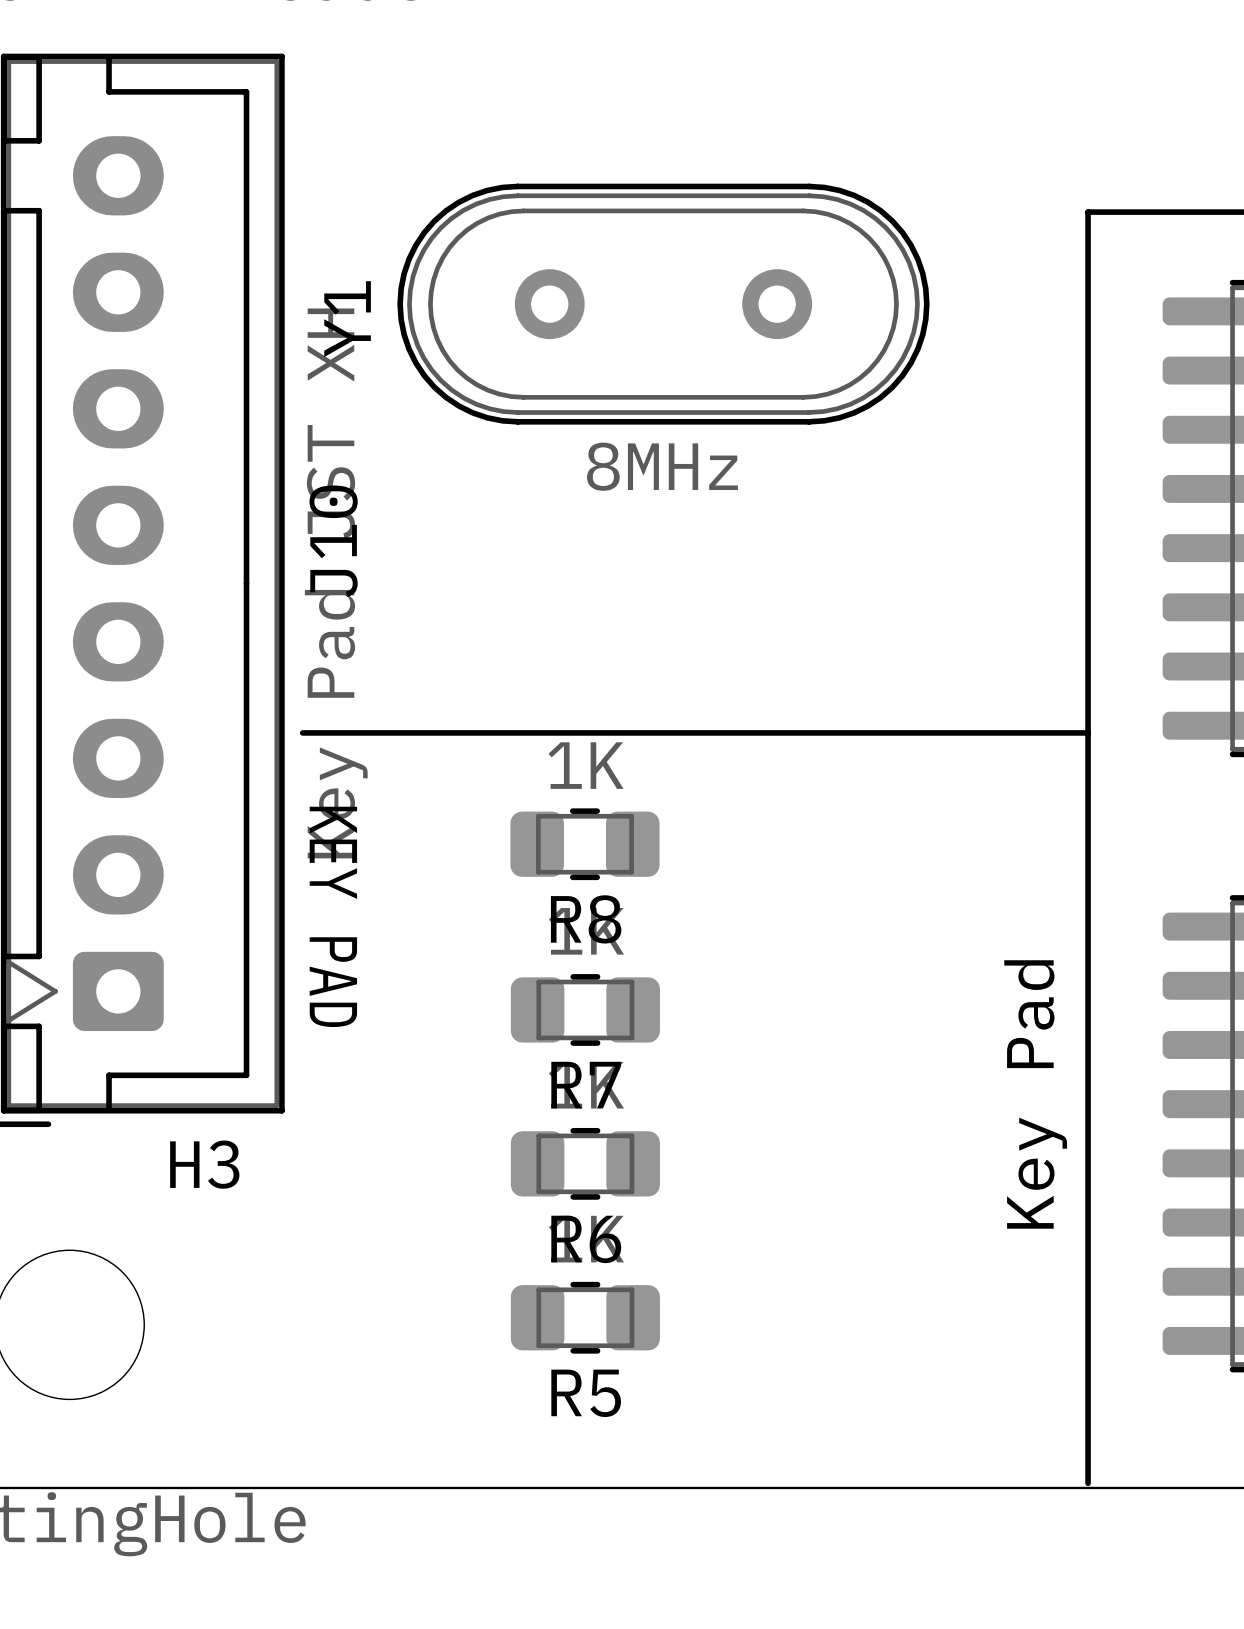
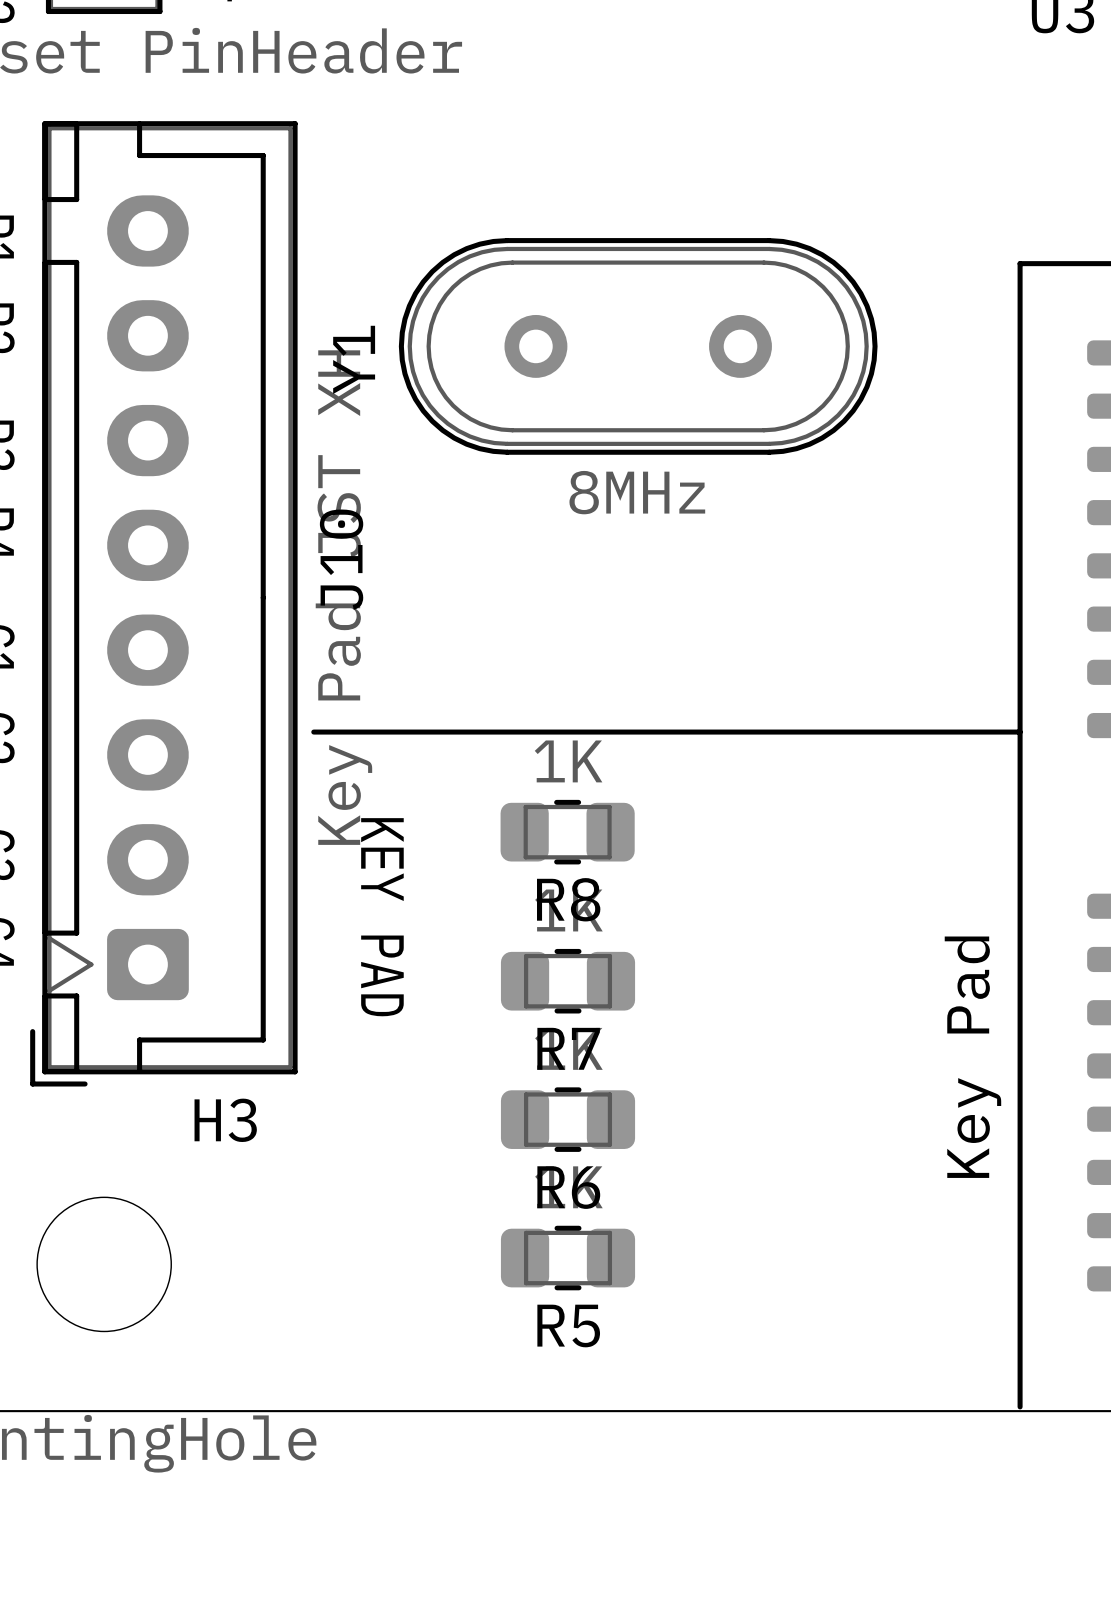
text position: KEY PAD (333, 916) -> KEY PAD (382, 917)

